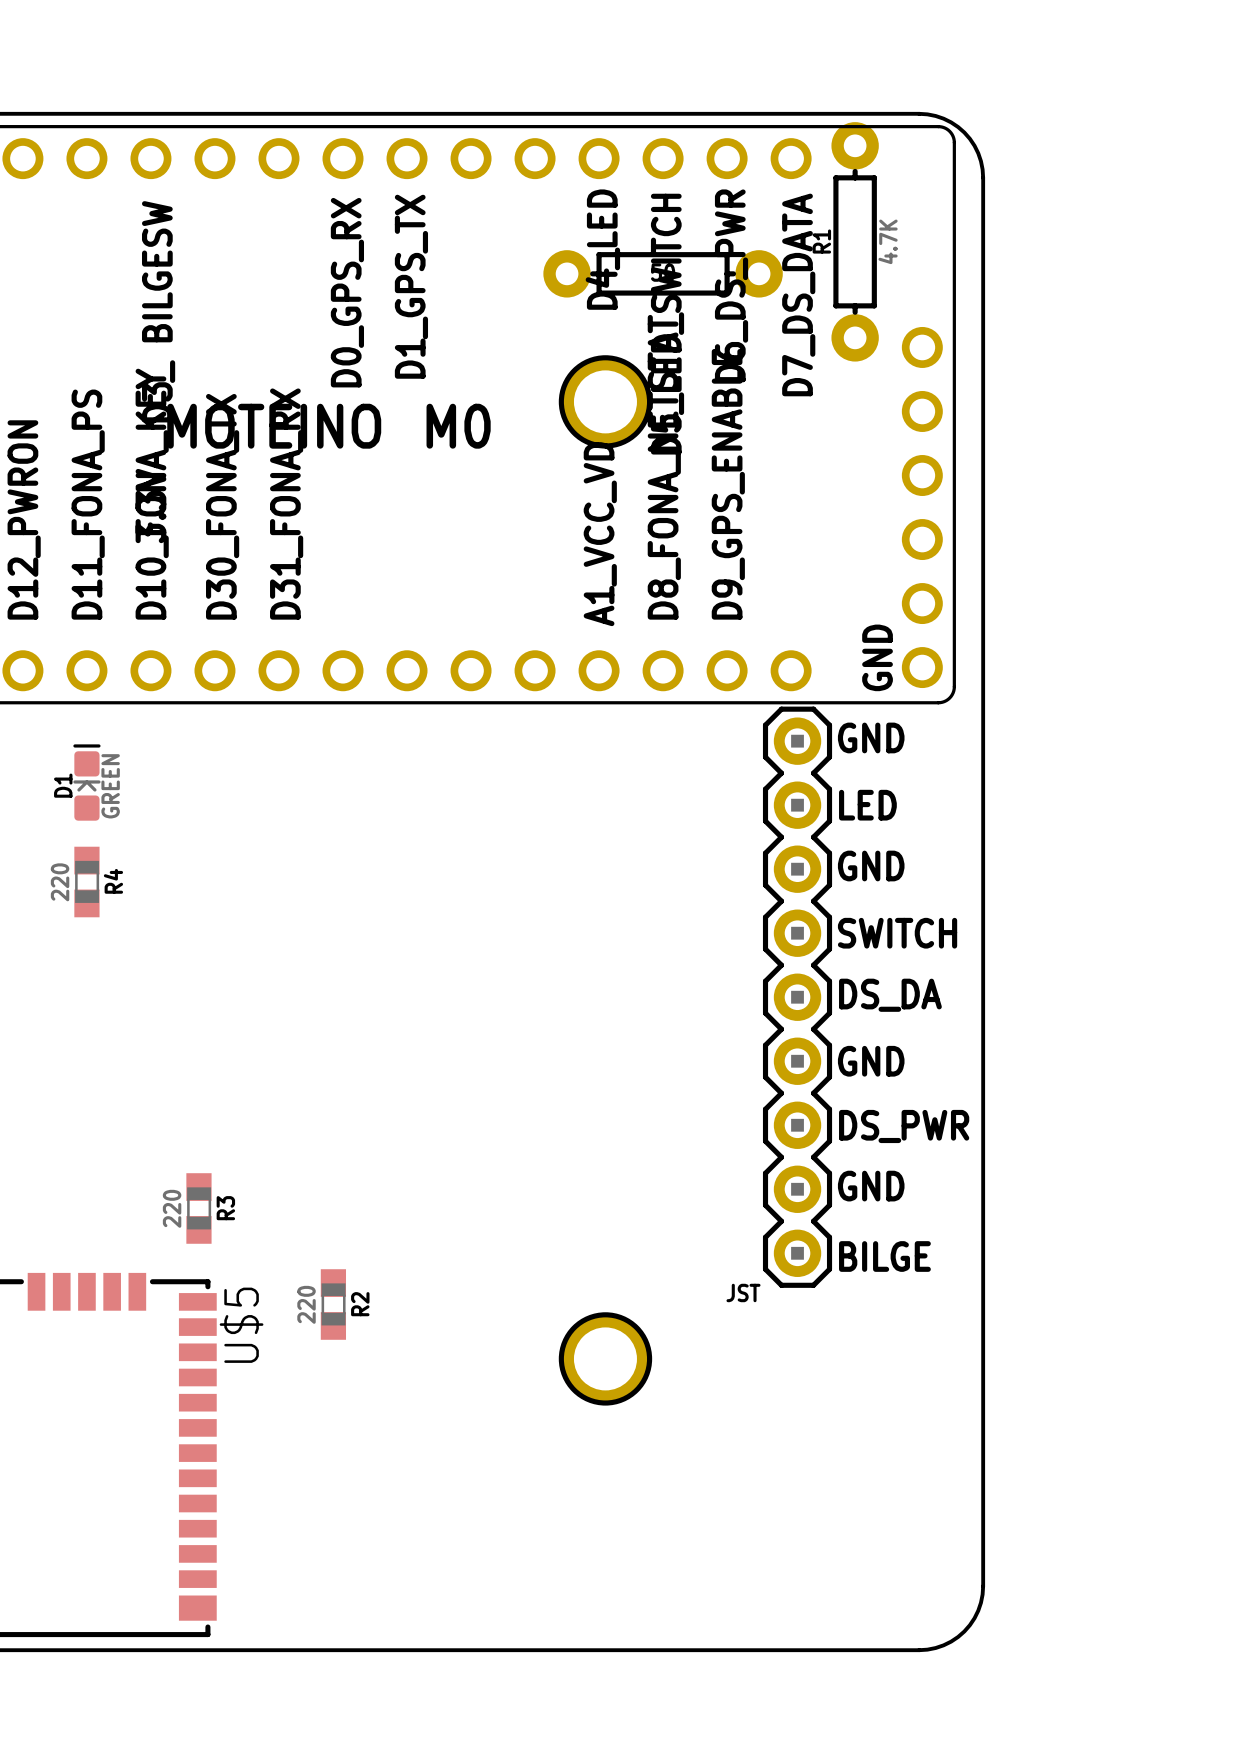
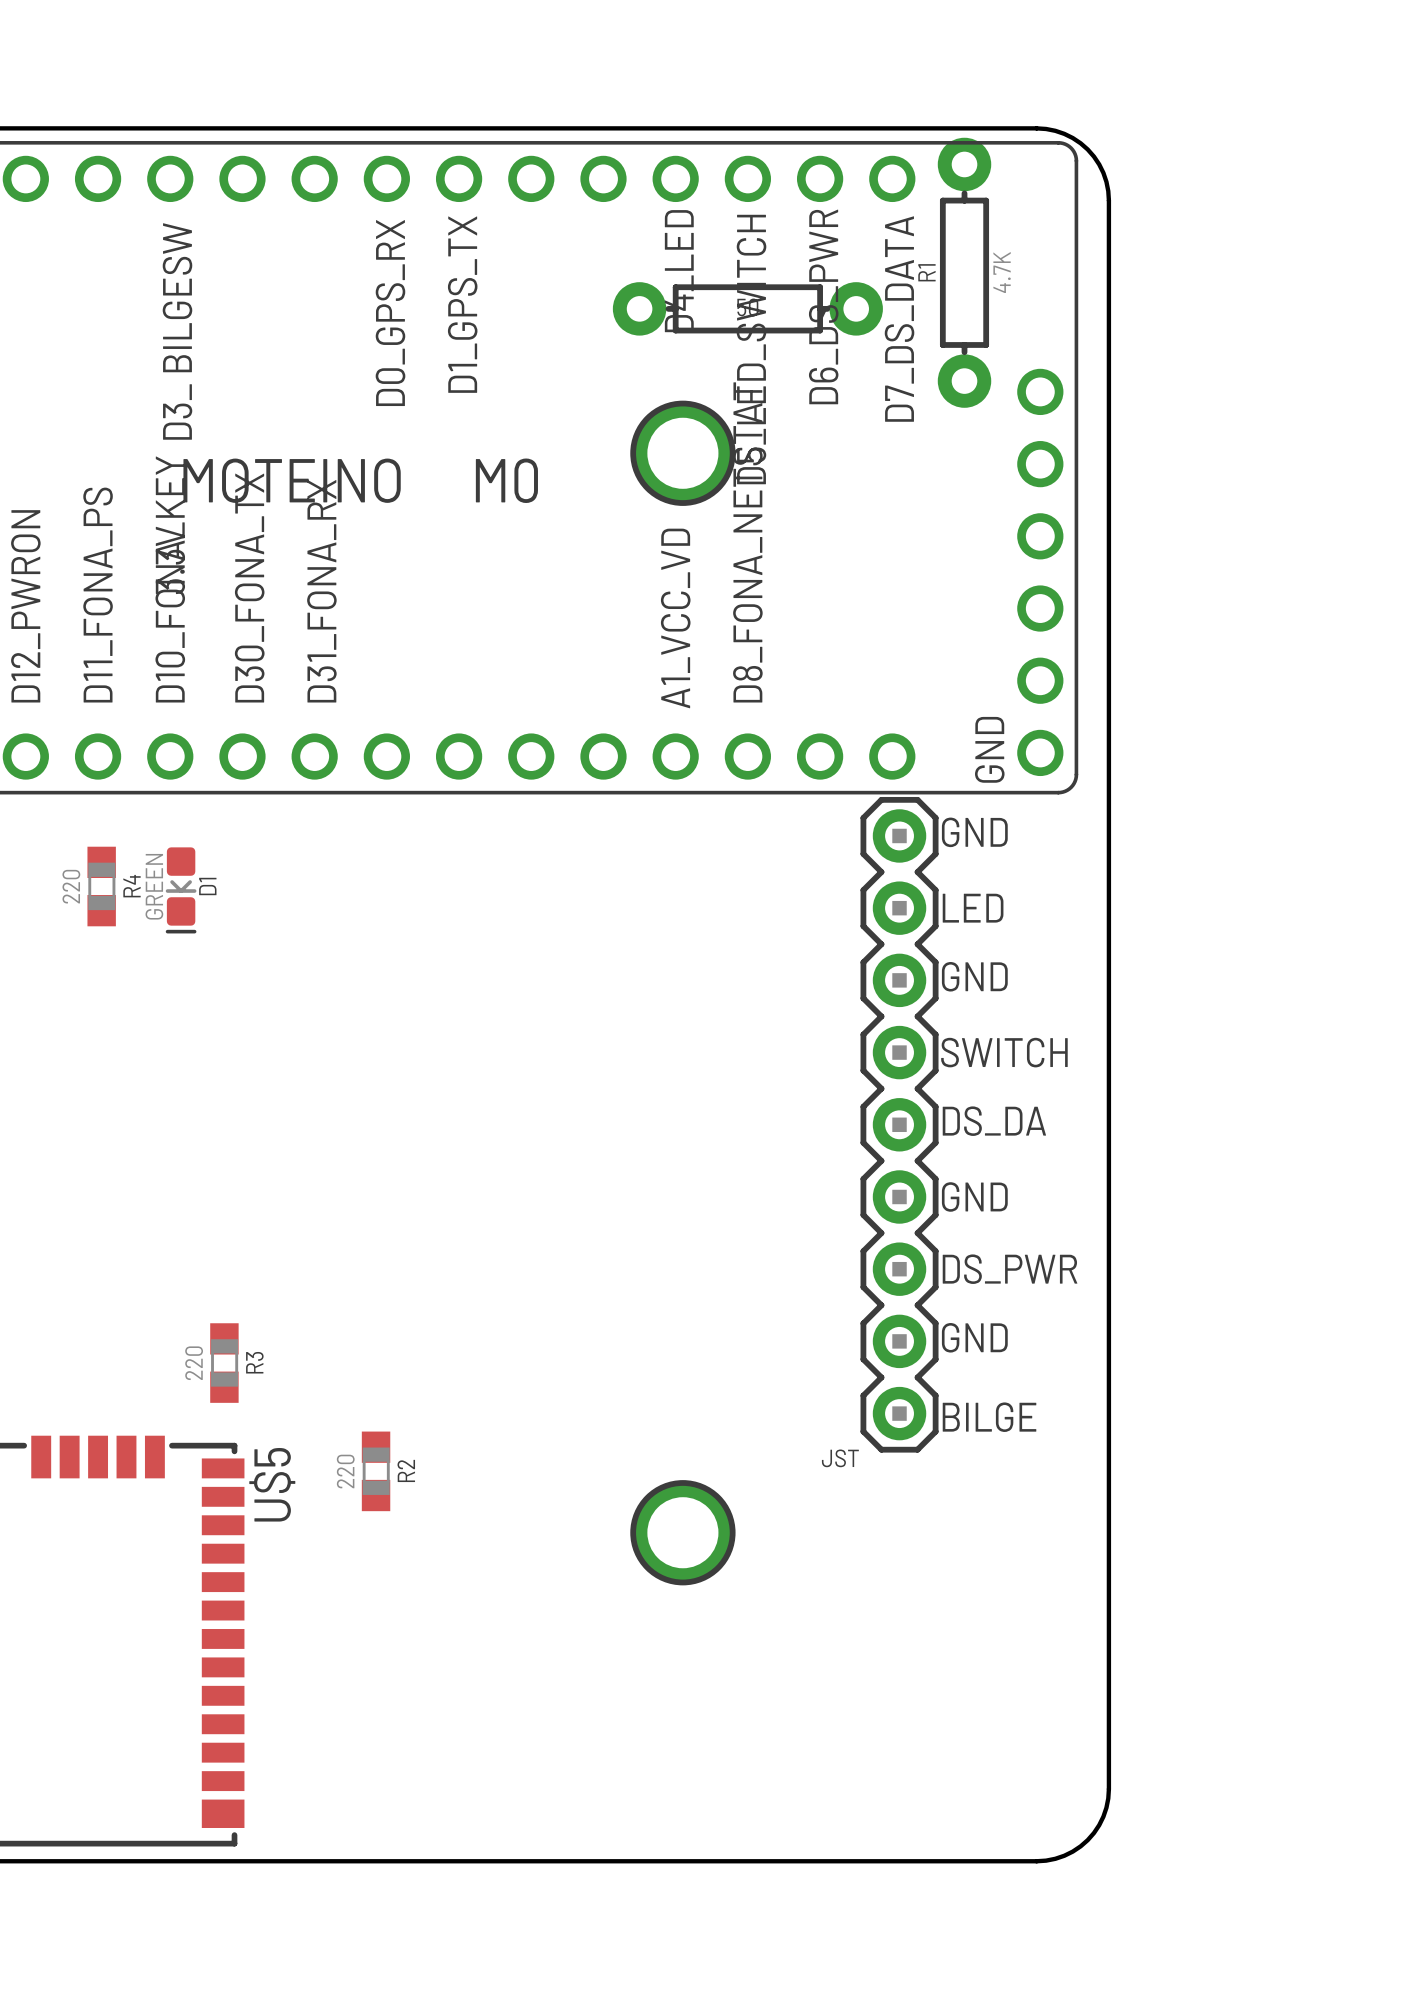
text: D9_GPS_ENABLE (728, 484) -> none
D1 rotation: 0° (86, 782) -> 180° (181, 890)
D1 position: (86, 782) -> (181, 890)
R4 position: (86, 882) -> (101, 886)

